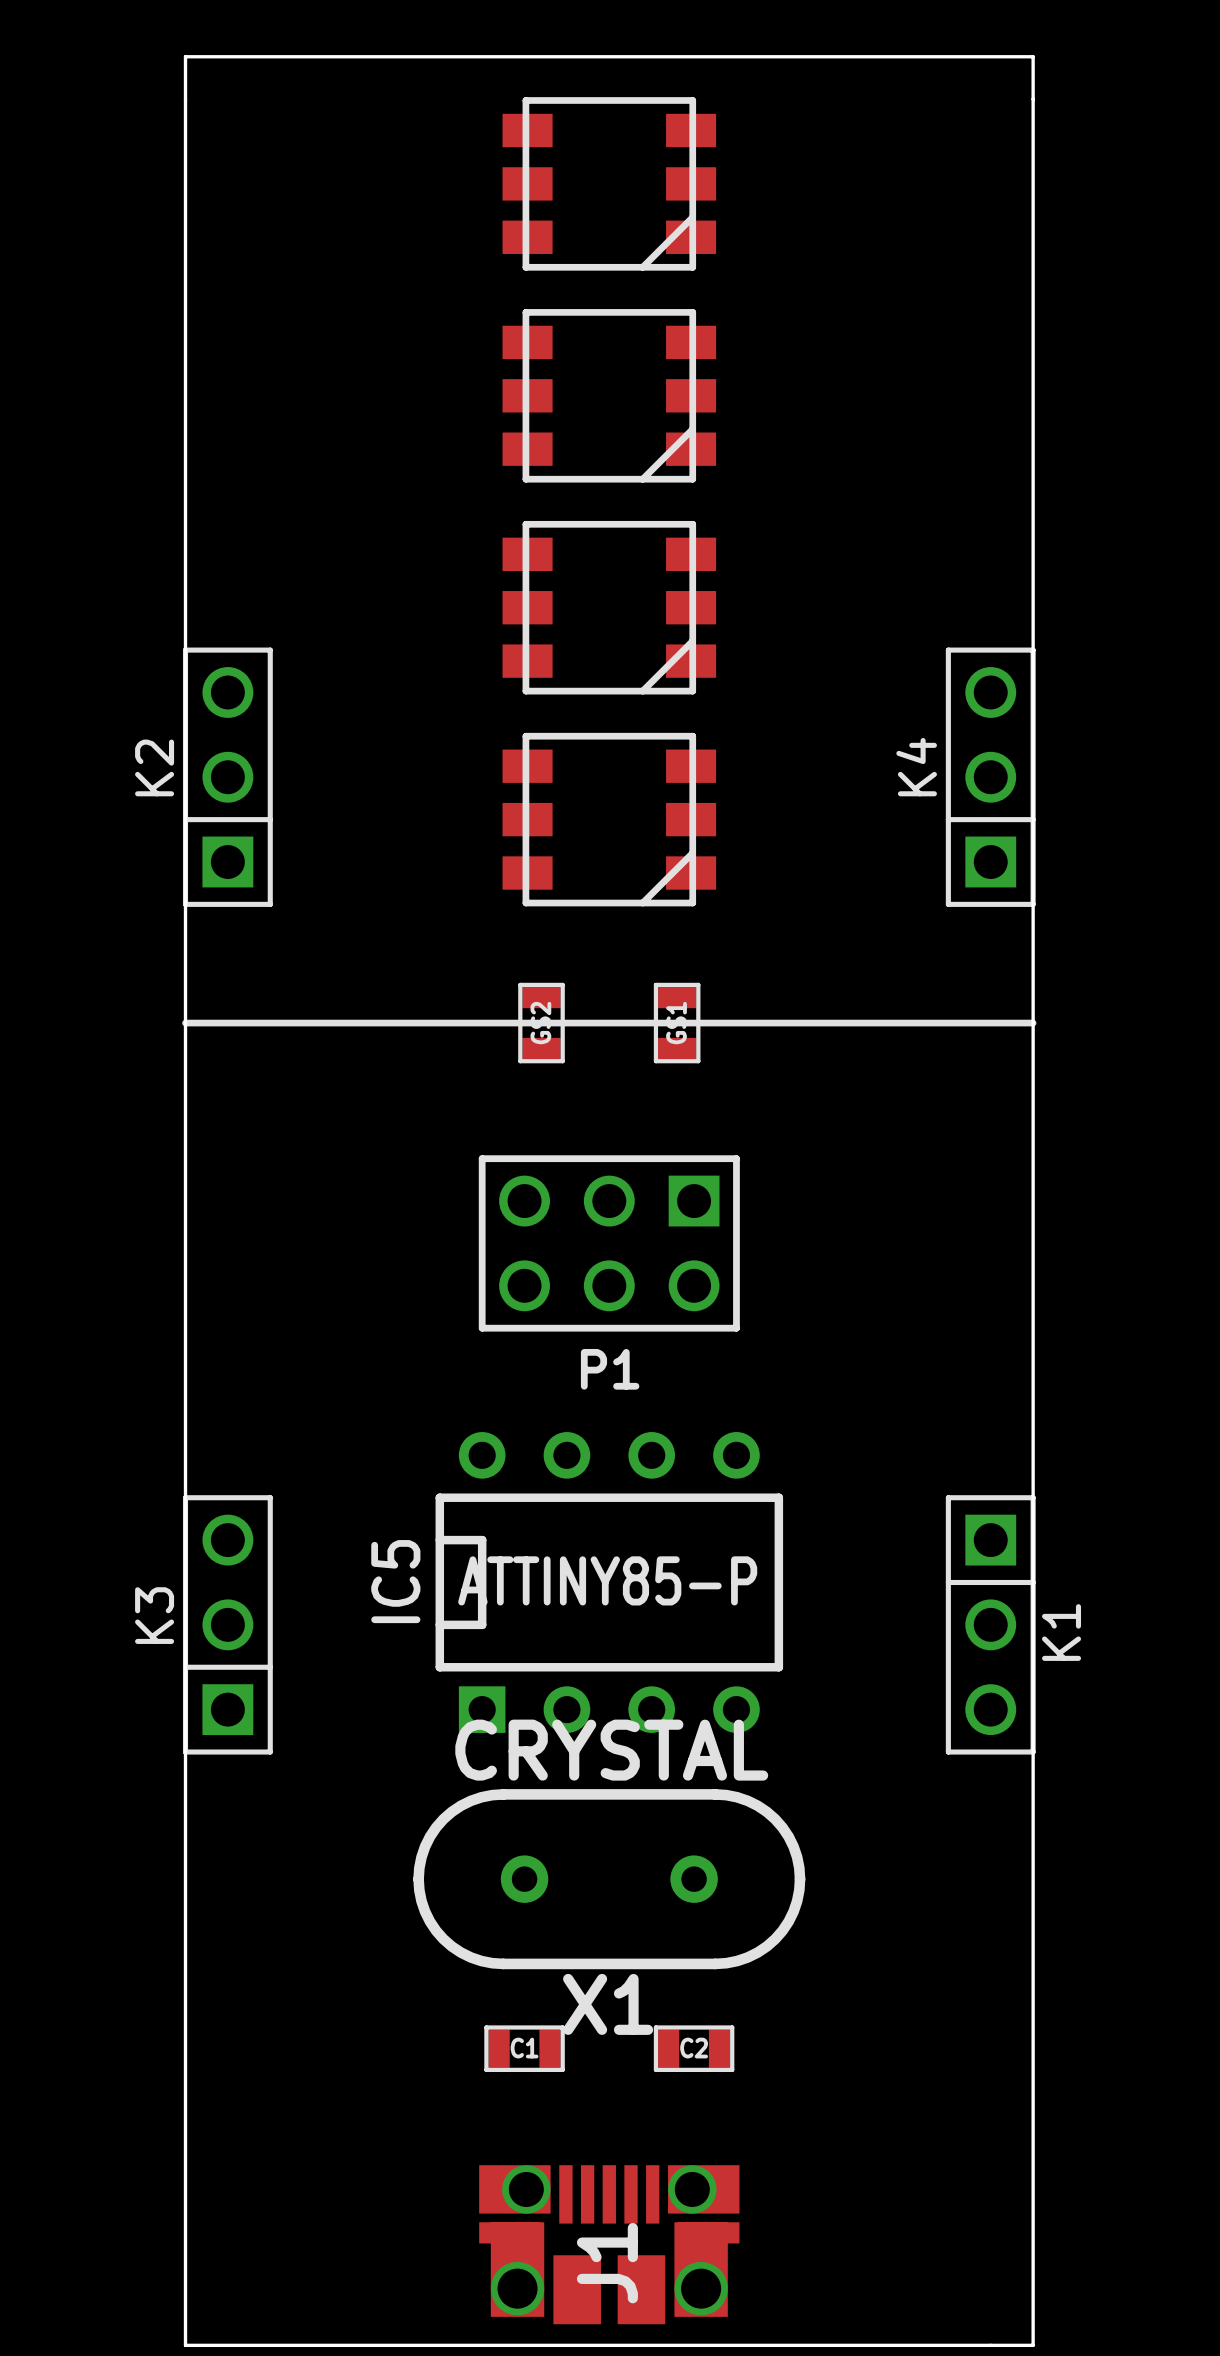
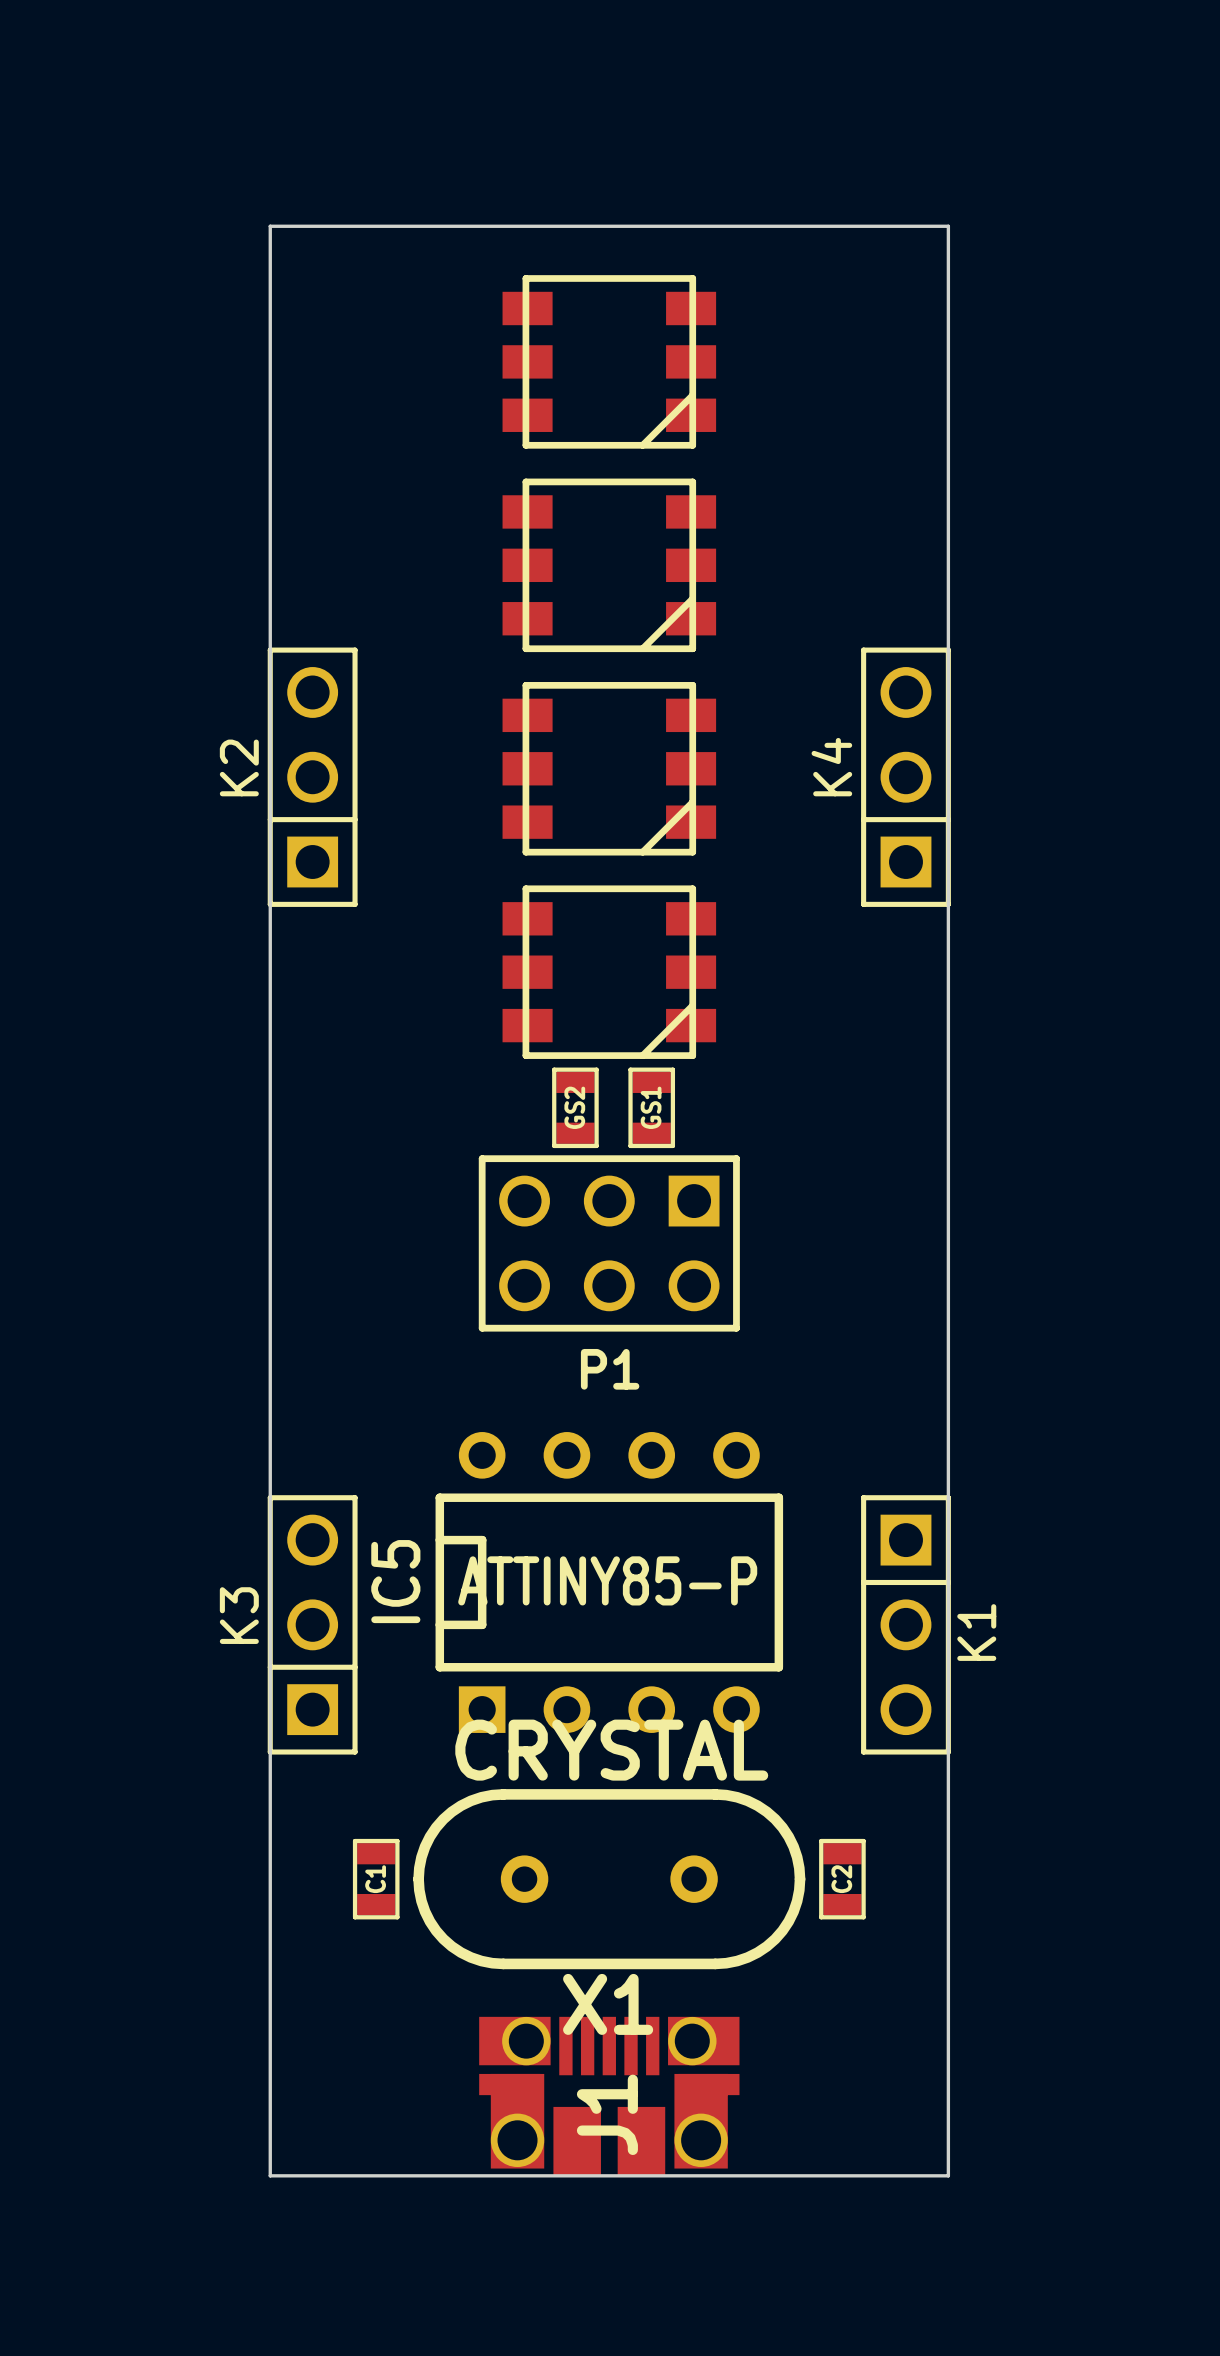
board edge: (185, 56) (1033, 56) (1033, 2345) (185, 2345) (185, 56) -> (270, 226) (270, 2175) (948, 2175) (948, 226) (270, 226)
part: (609, 183) -> none
part position: (609, 395) -> (609, 361)
part position: (609, 607) -> (609, 565)
K2 position: (227, 777) -> (312, 777)
K4 position: (990, 777) -> (905, 777)
part position: (609, 819) -> (609, 768)
part: none -> (609, 972)
line: (185, 1023) (1033, 1023) -> none
GS2 position: (541, 1023) -> (575, 1107)
GS1 position: (677, 1023) -> (651, 1107)
K3 position: (227, 1624) -> (312, 1624)
K1 position: (990, 1624) -> (905, 1624)
C1 rotation: 0° (524, 2048) -> 90° clockwise (376, 1879)
C1 position: (524, 2048) -> (376, 1879)
C2 rotation: 0° (694, 2048) -> 90° clockwise (842, 1879)
C2 position: (694, 2048) -> (842, 1879)
J1 position: (609, 2244) -> (609, 2096)

